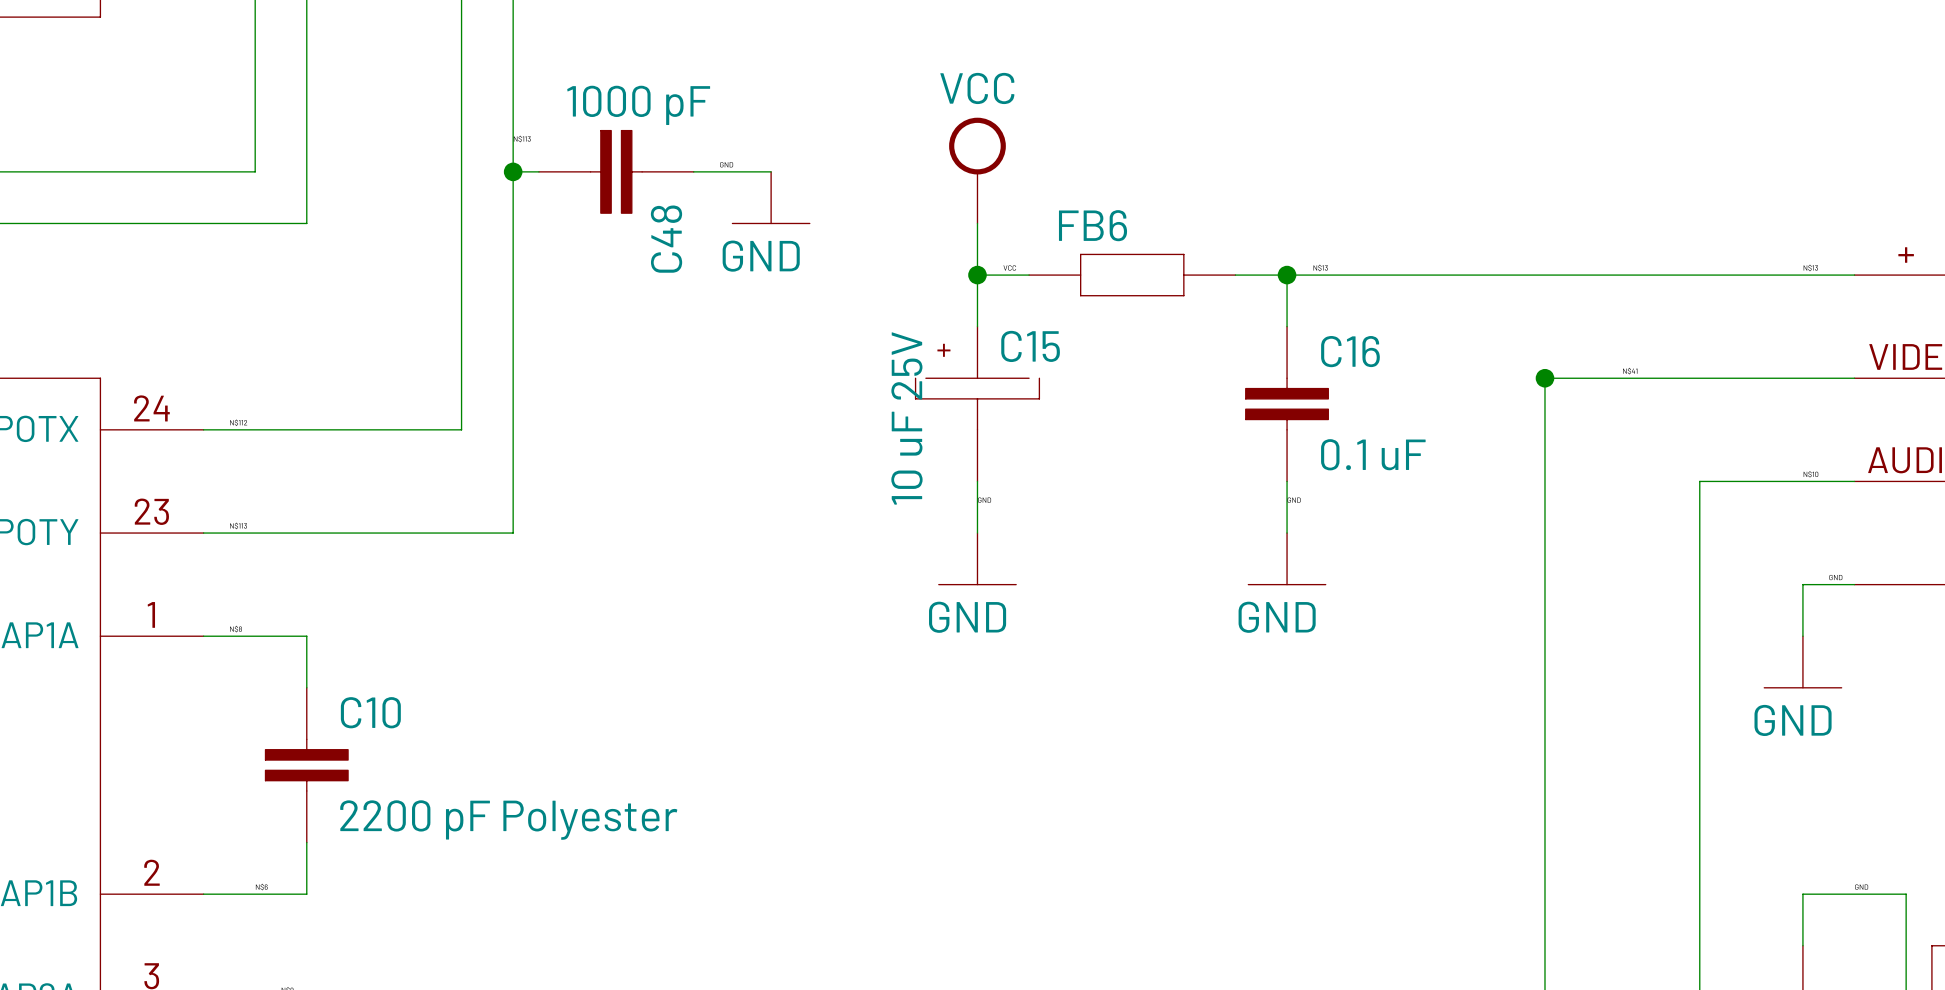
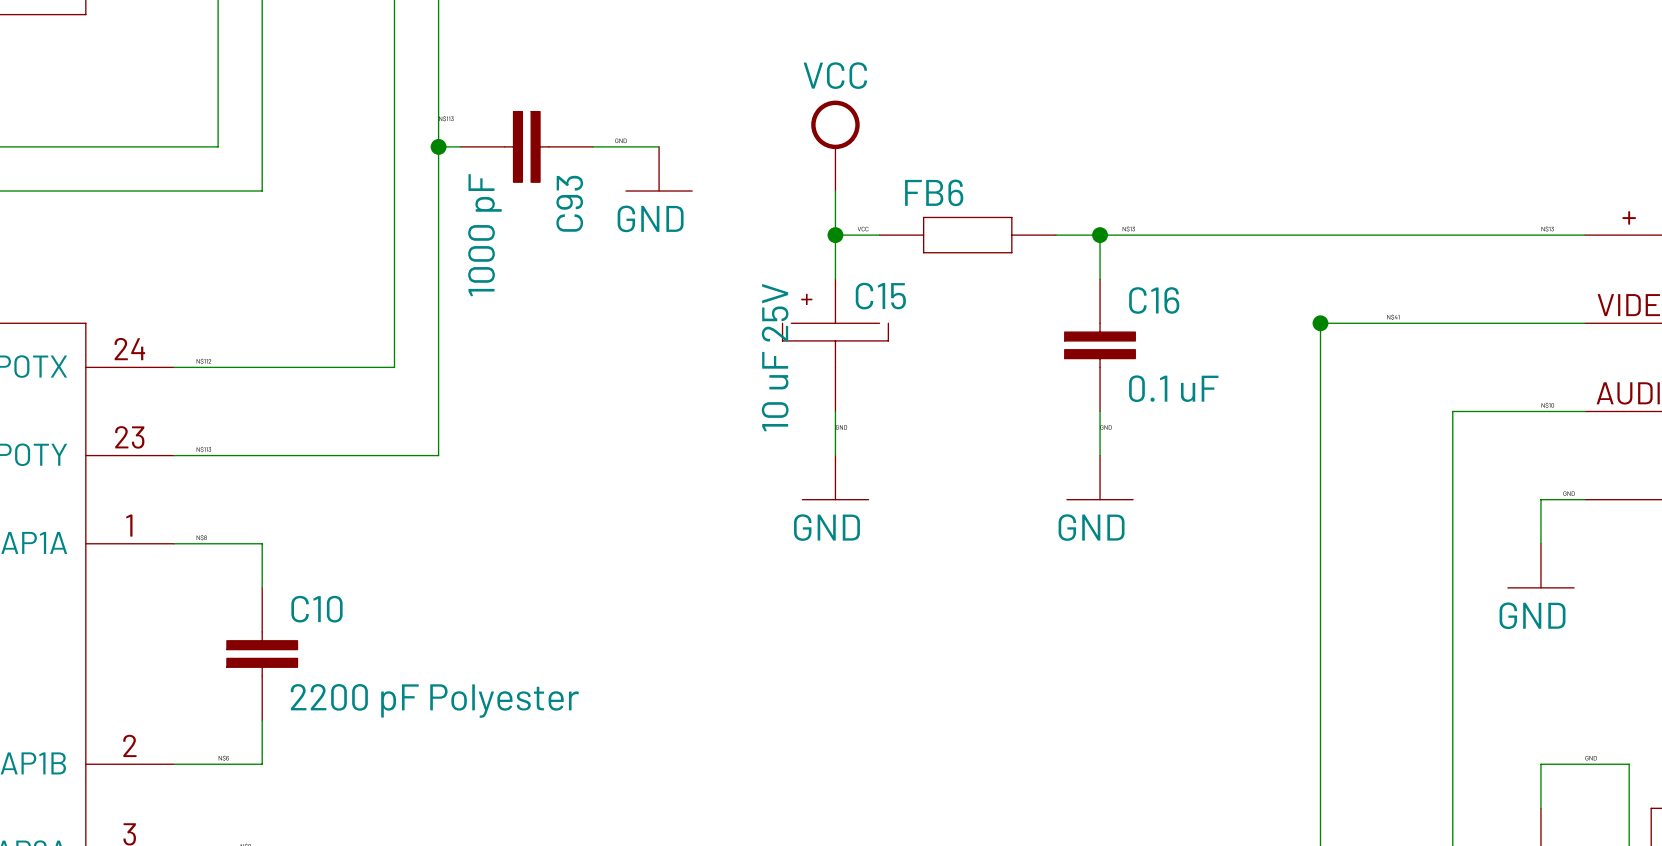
C48 value rotation: 0° (638, 105) -> 90° counterclockwise (484, 235)
C48 value position: 1000 pF (638, 105) -> 1000 pF (484, 235)
C48 name: C48 (666, 239) -> C93 (569, 203)

